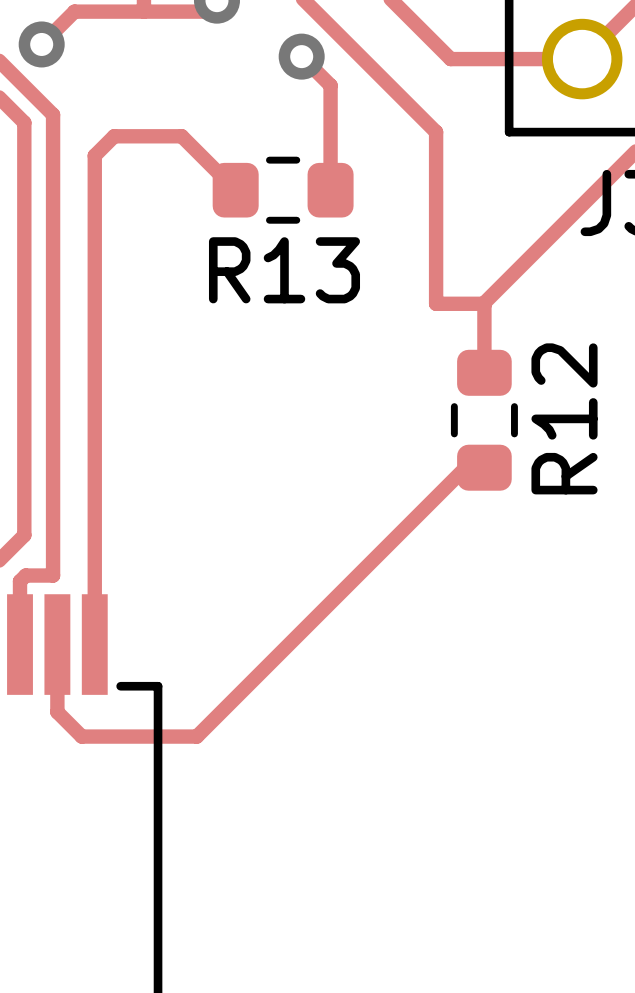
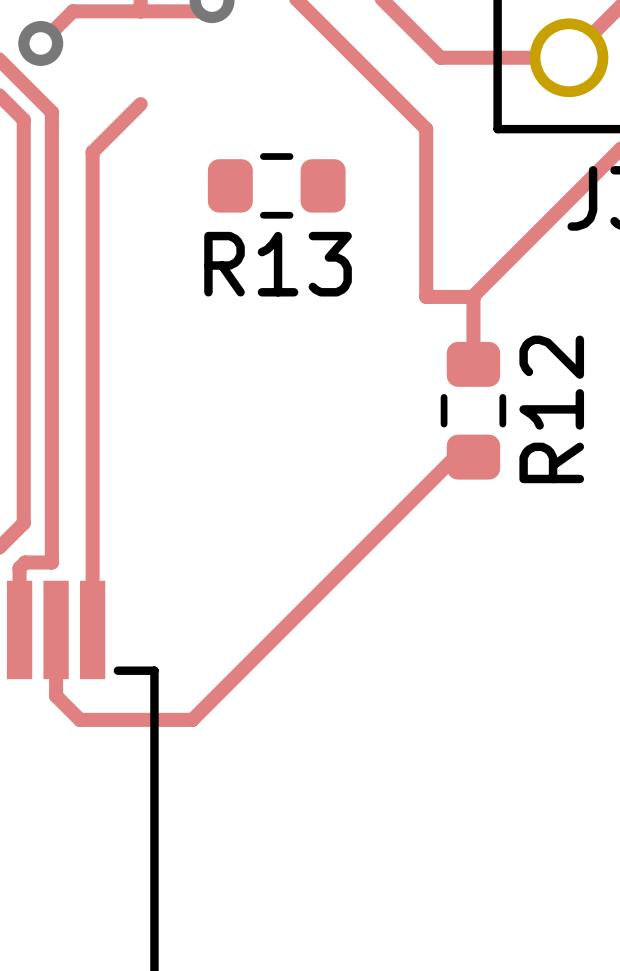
track: (301, 56) (330, 85) (330, 190) -> none
via: (301, 56) -> none
track: (114, 136) (181, 136) (235, 190) -> (111, 133) (140, 104)

